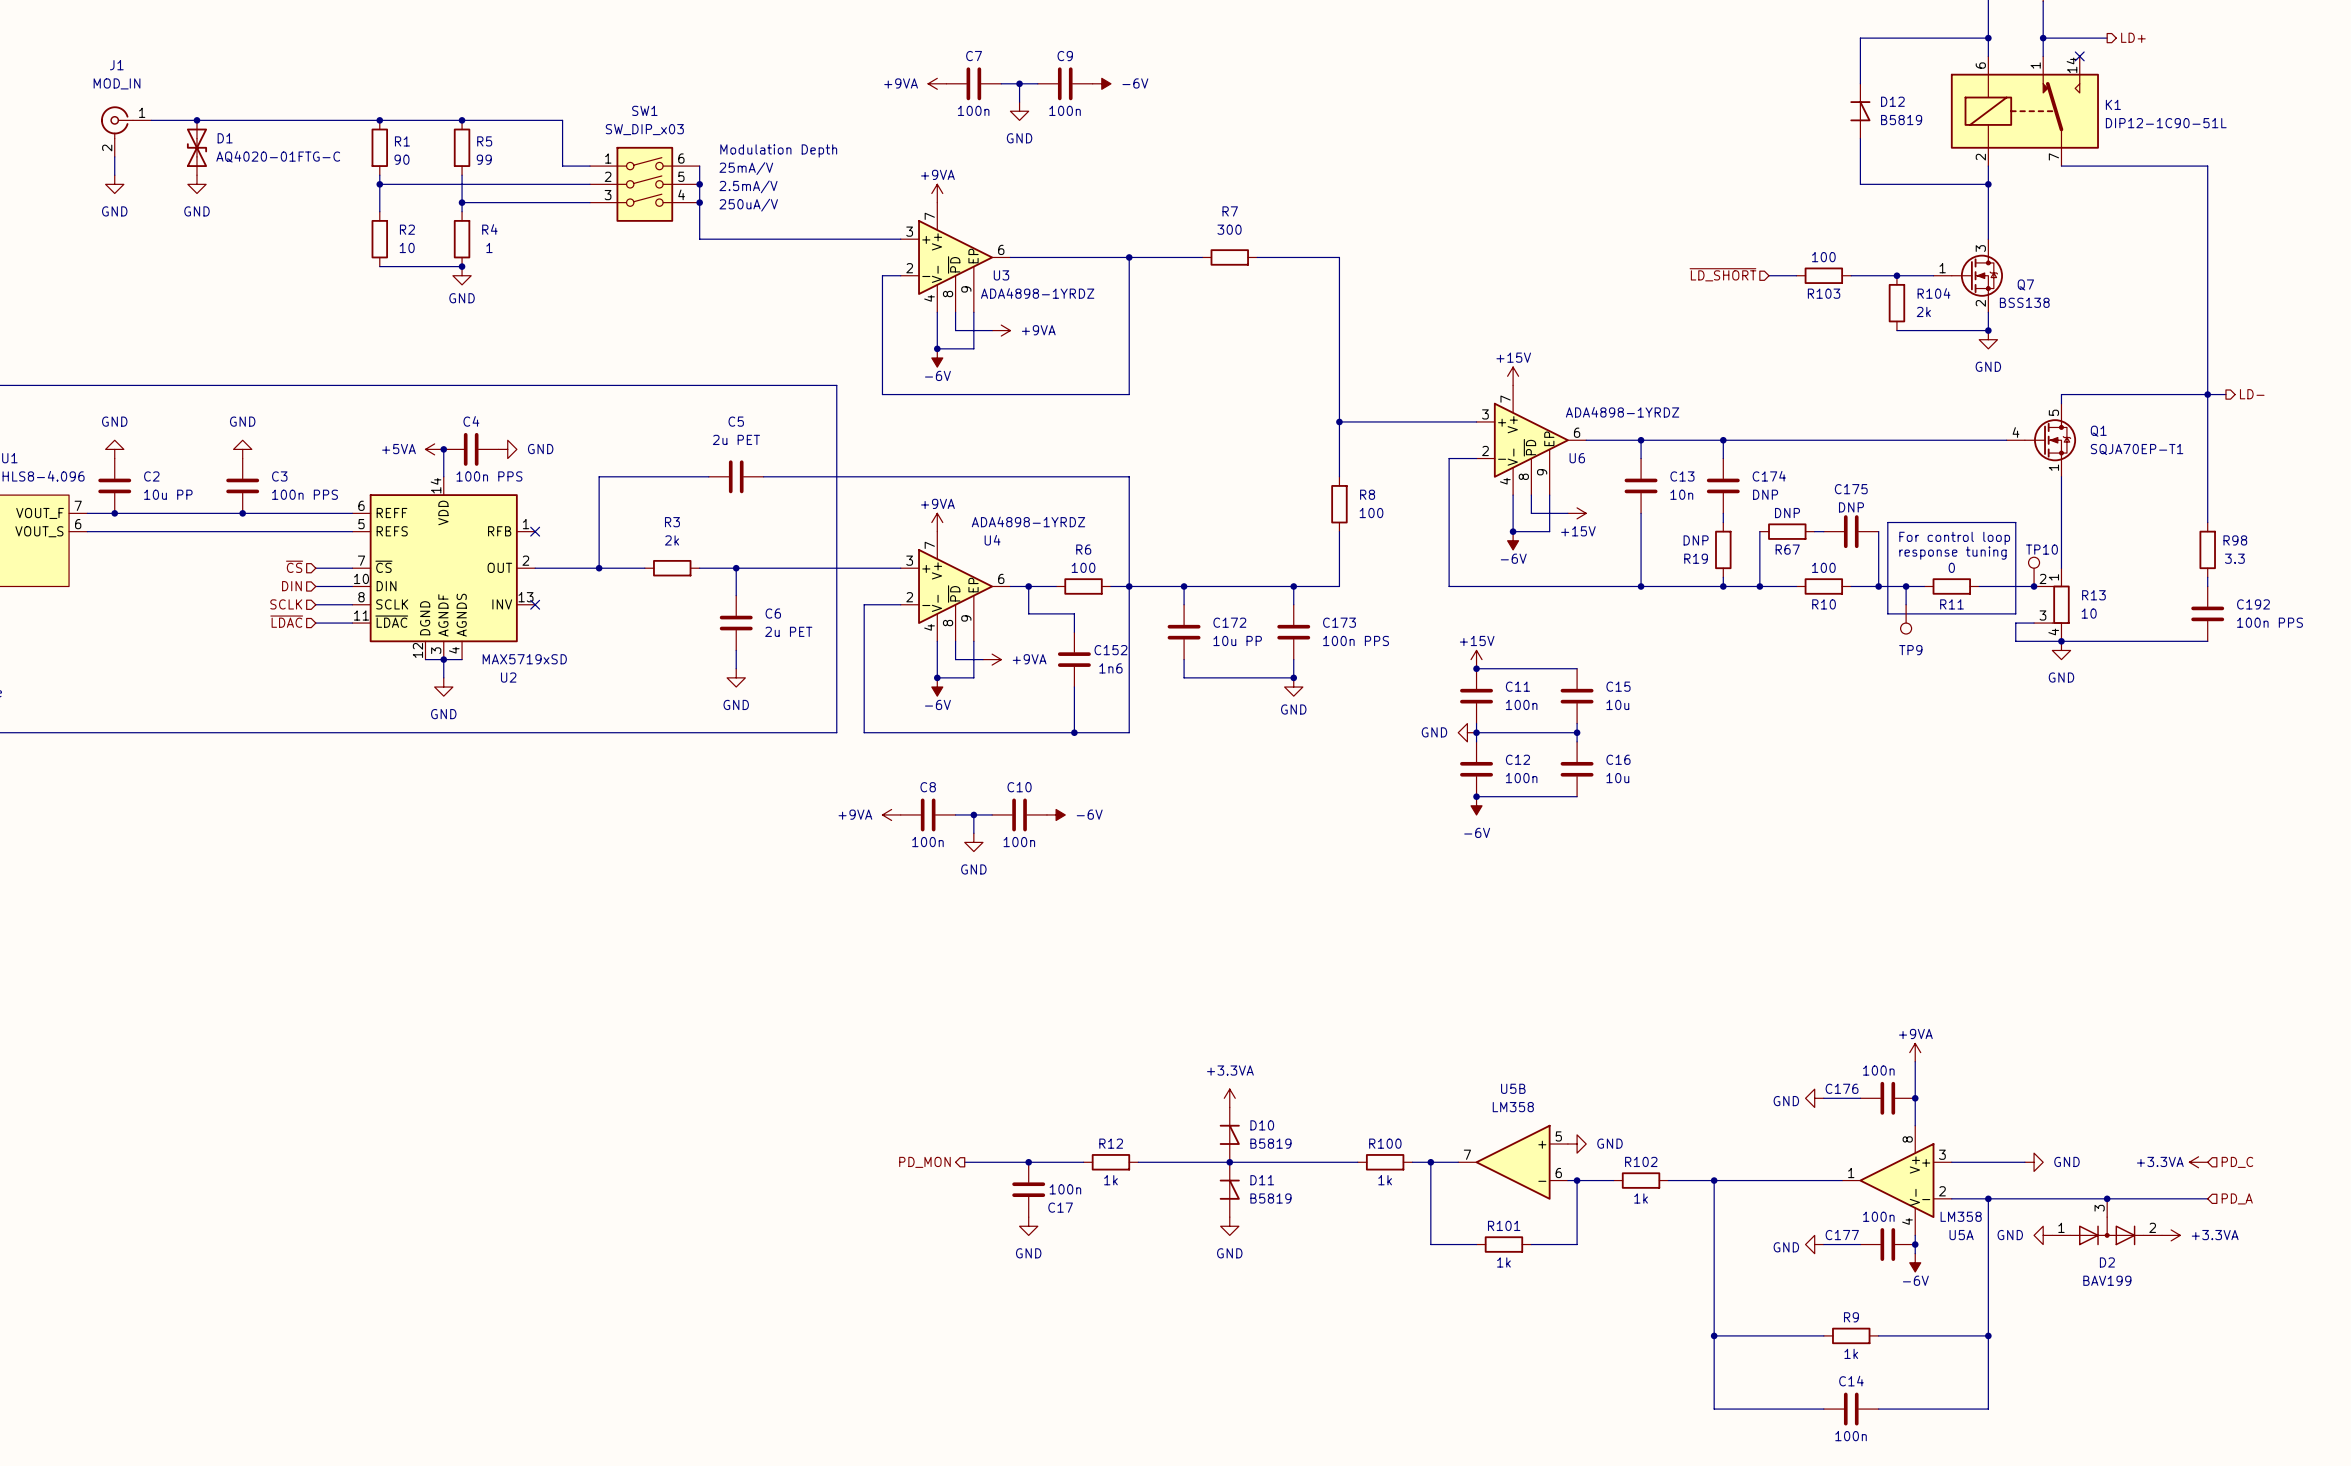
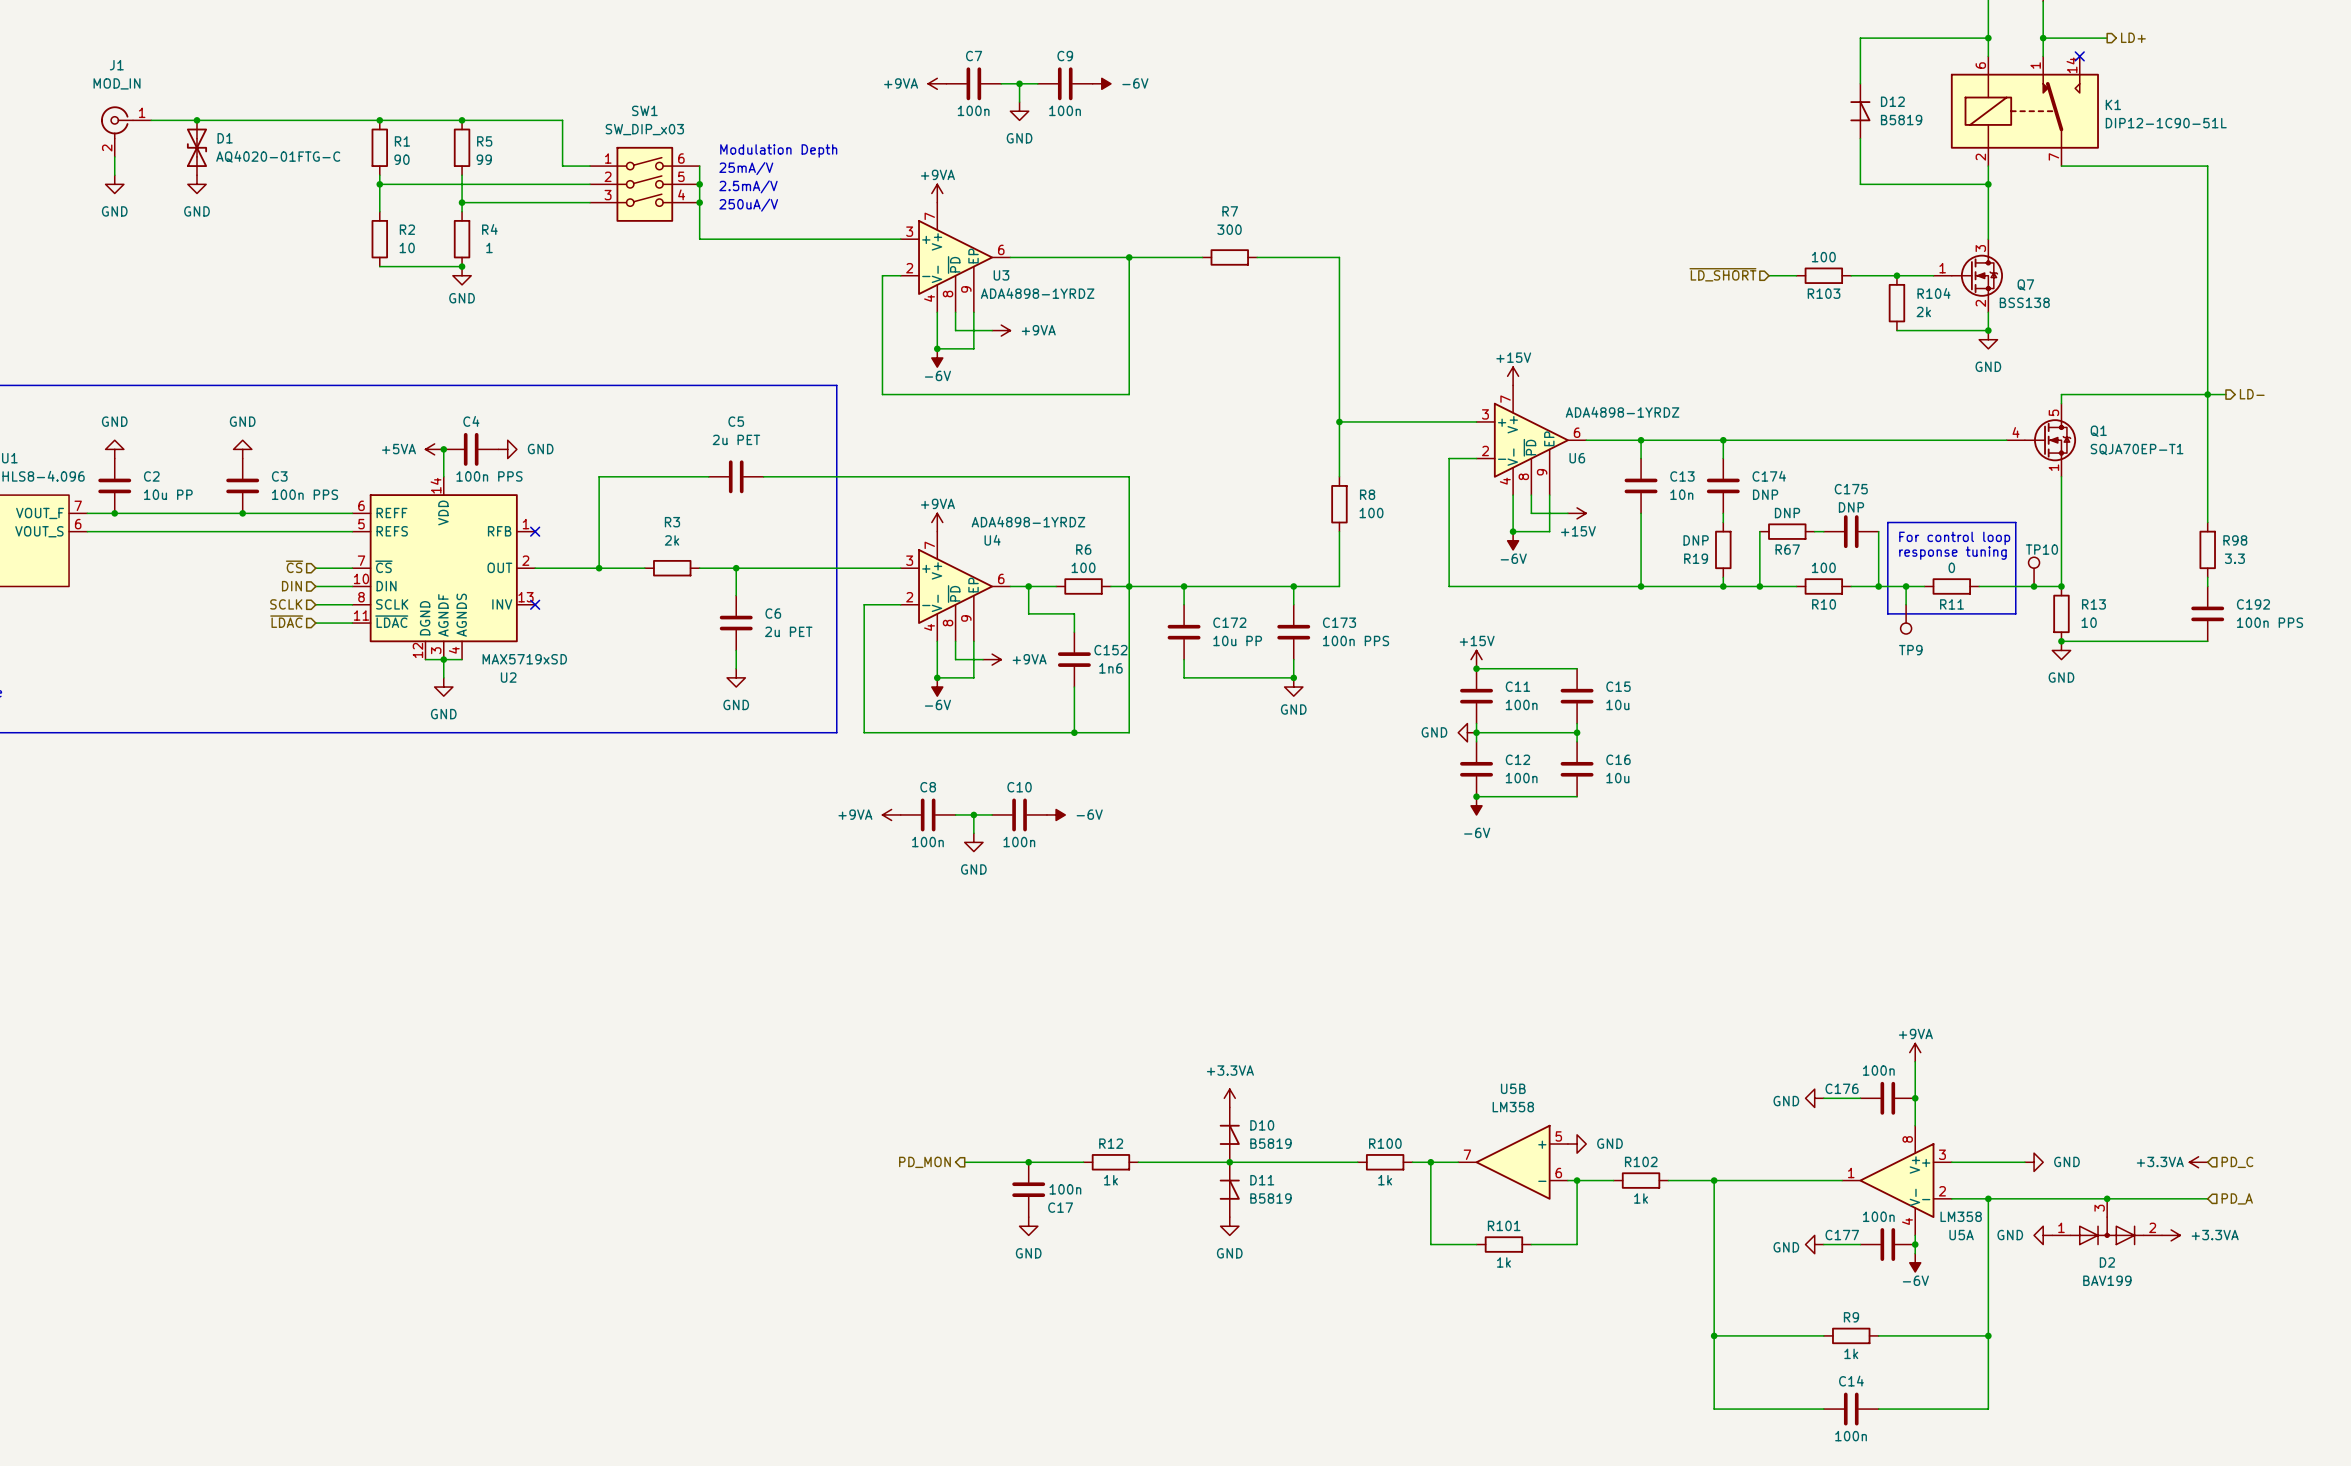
R13 symbol: [2034, 568, 2070, 642] -> [2053, 586, 2070, 642]
junction: none -> (2061, 586)
wire: (2034, 623) (2015, 623) (2015, 641) (2061, 641) -> none

